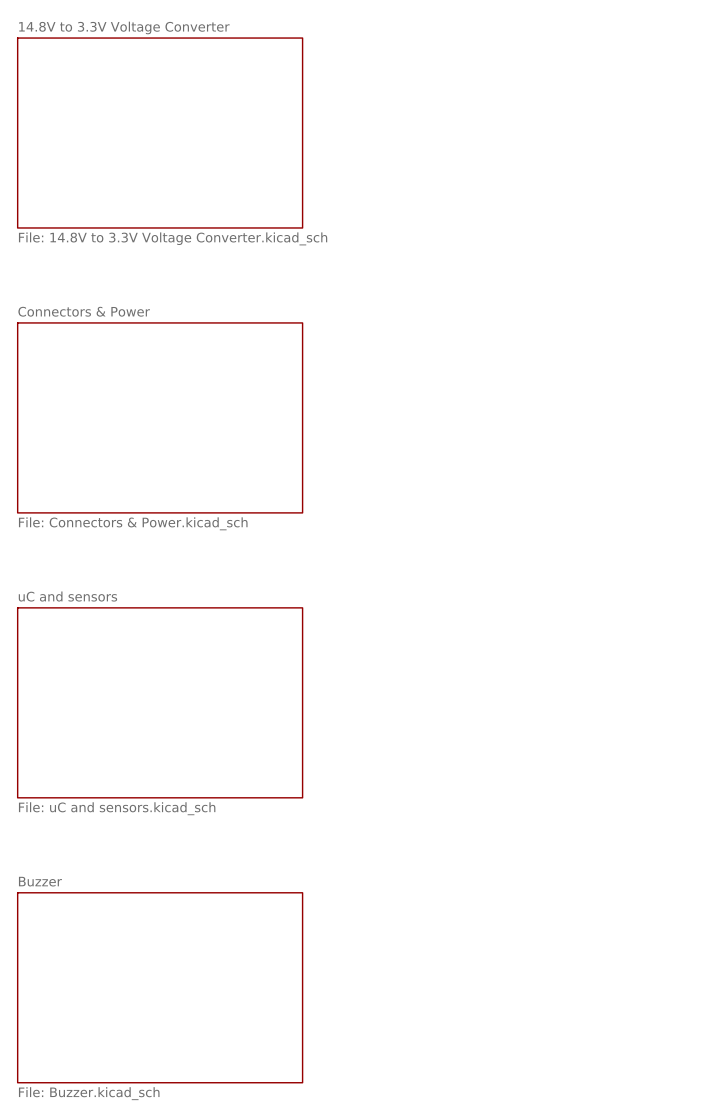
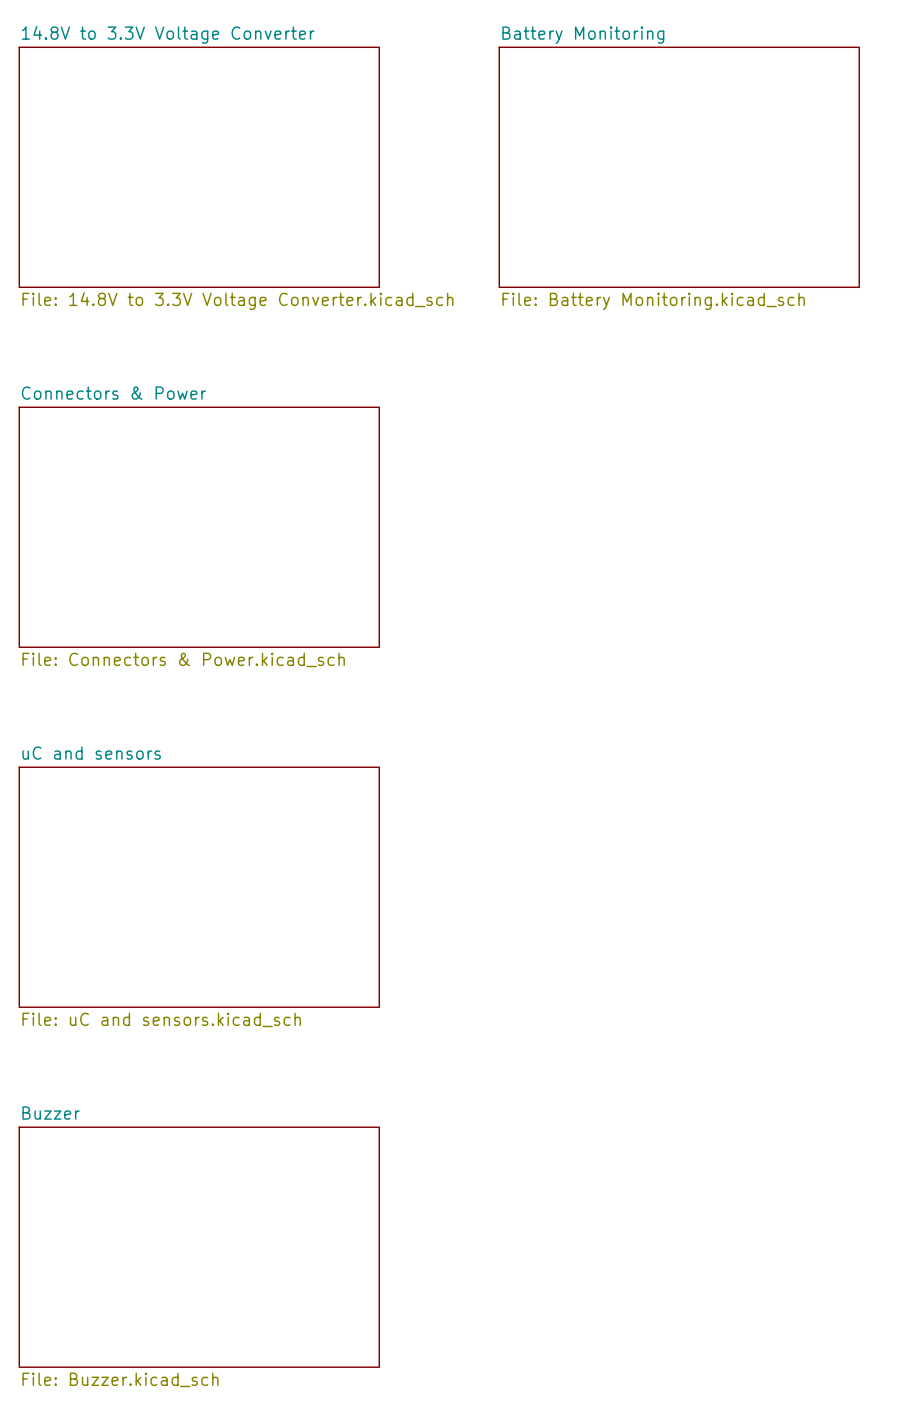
sheet Battery Monitoring: none -> File: Battery Monitoring.kicad_sch (679, 167)

